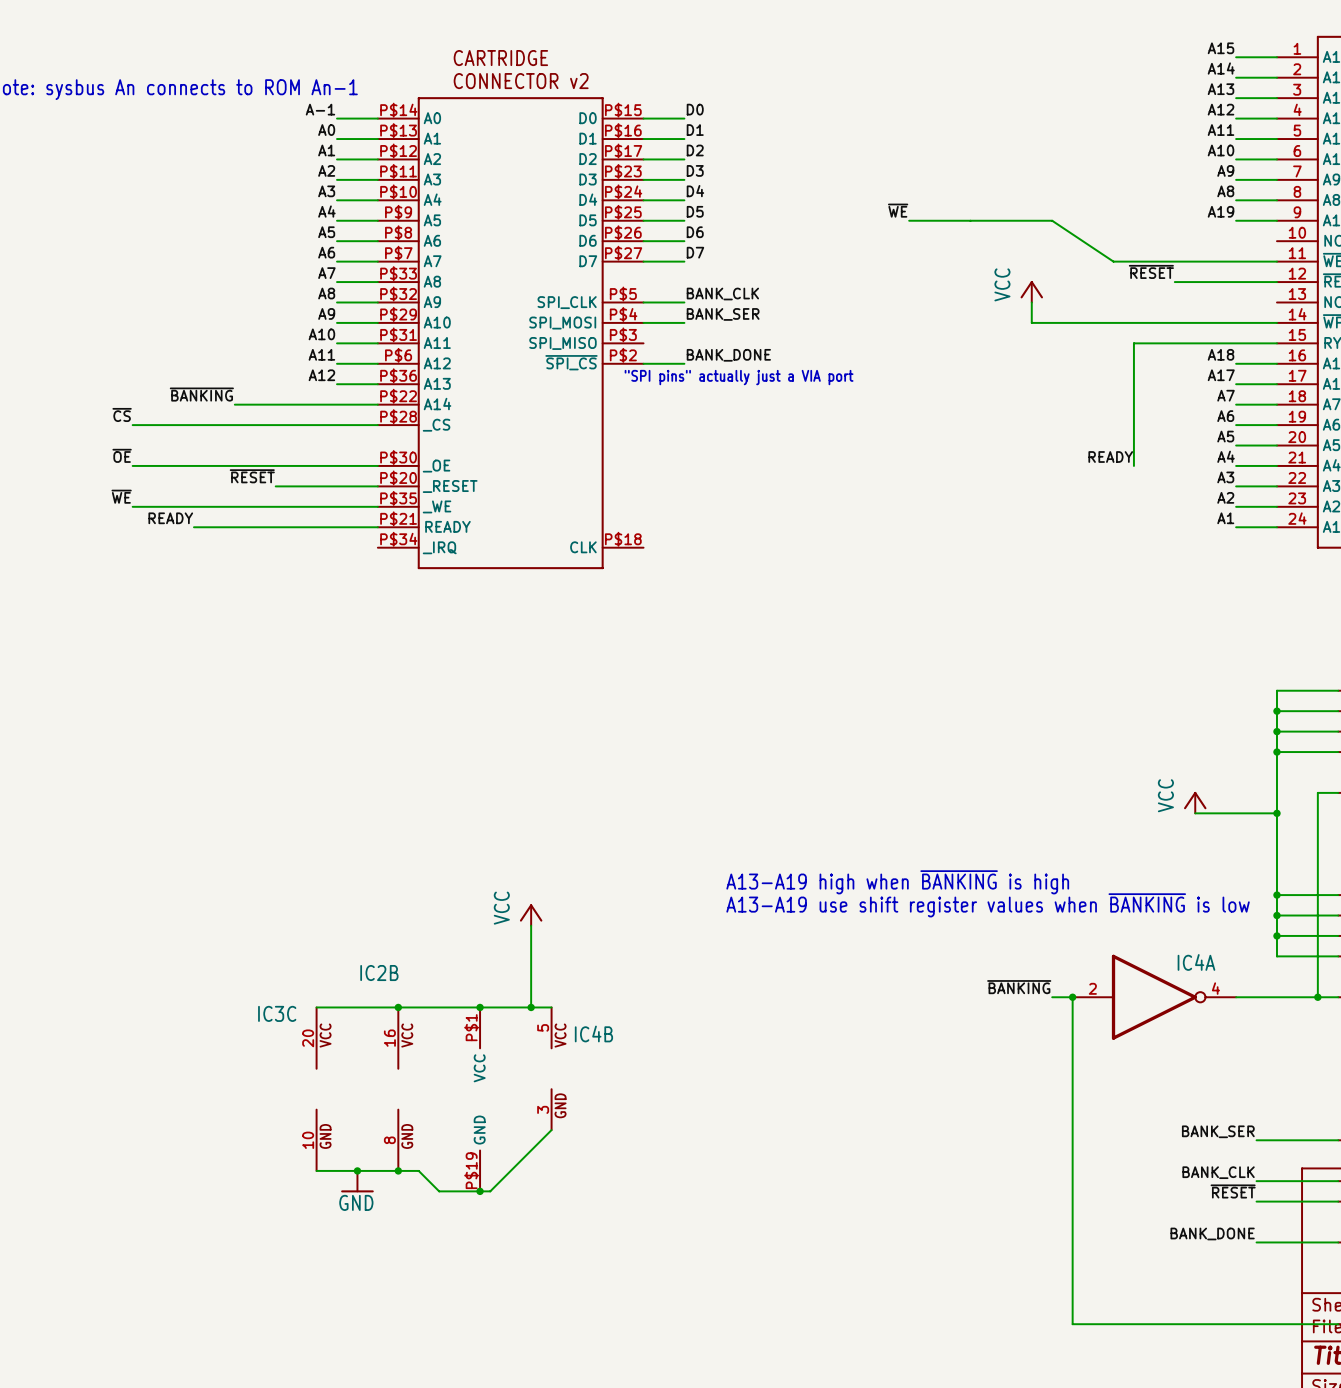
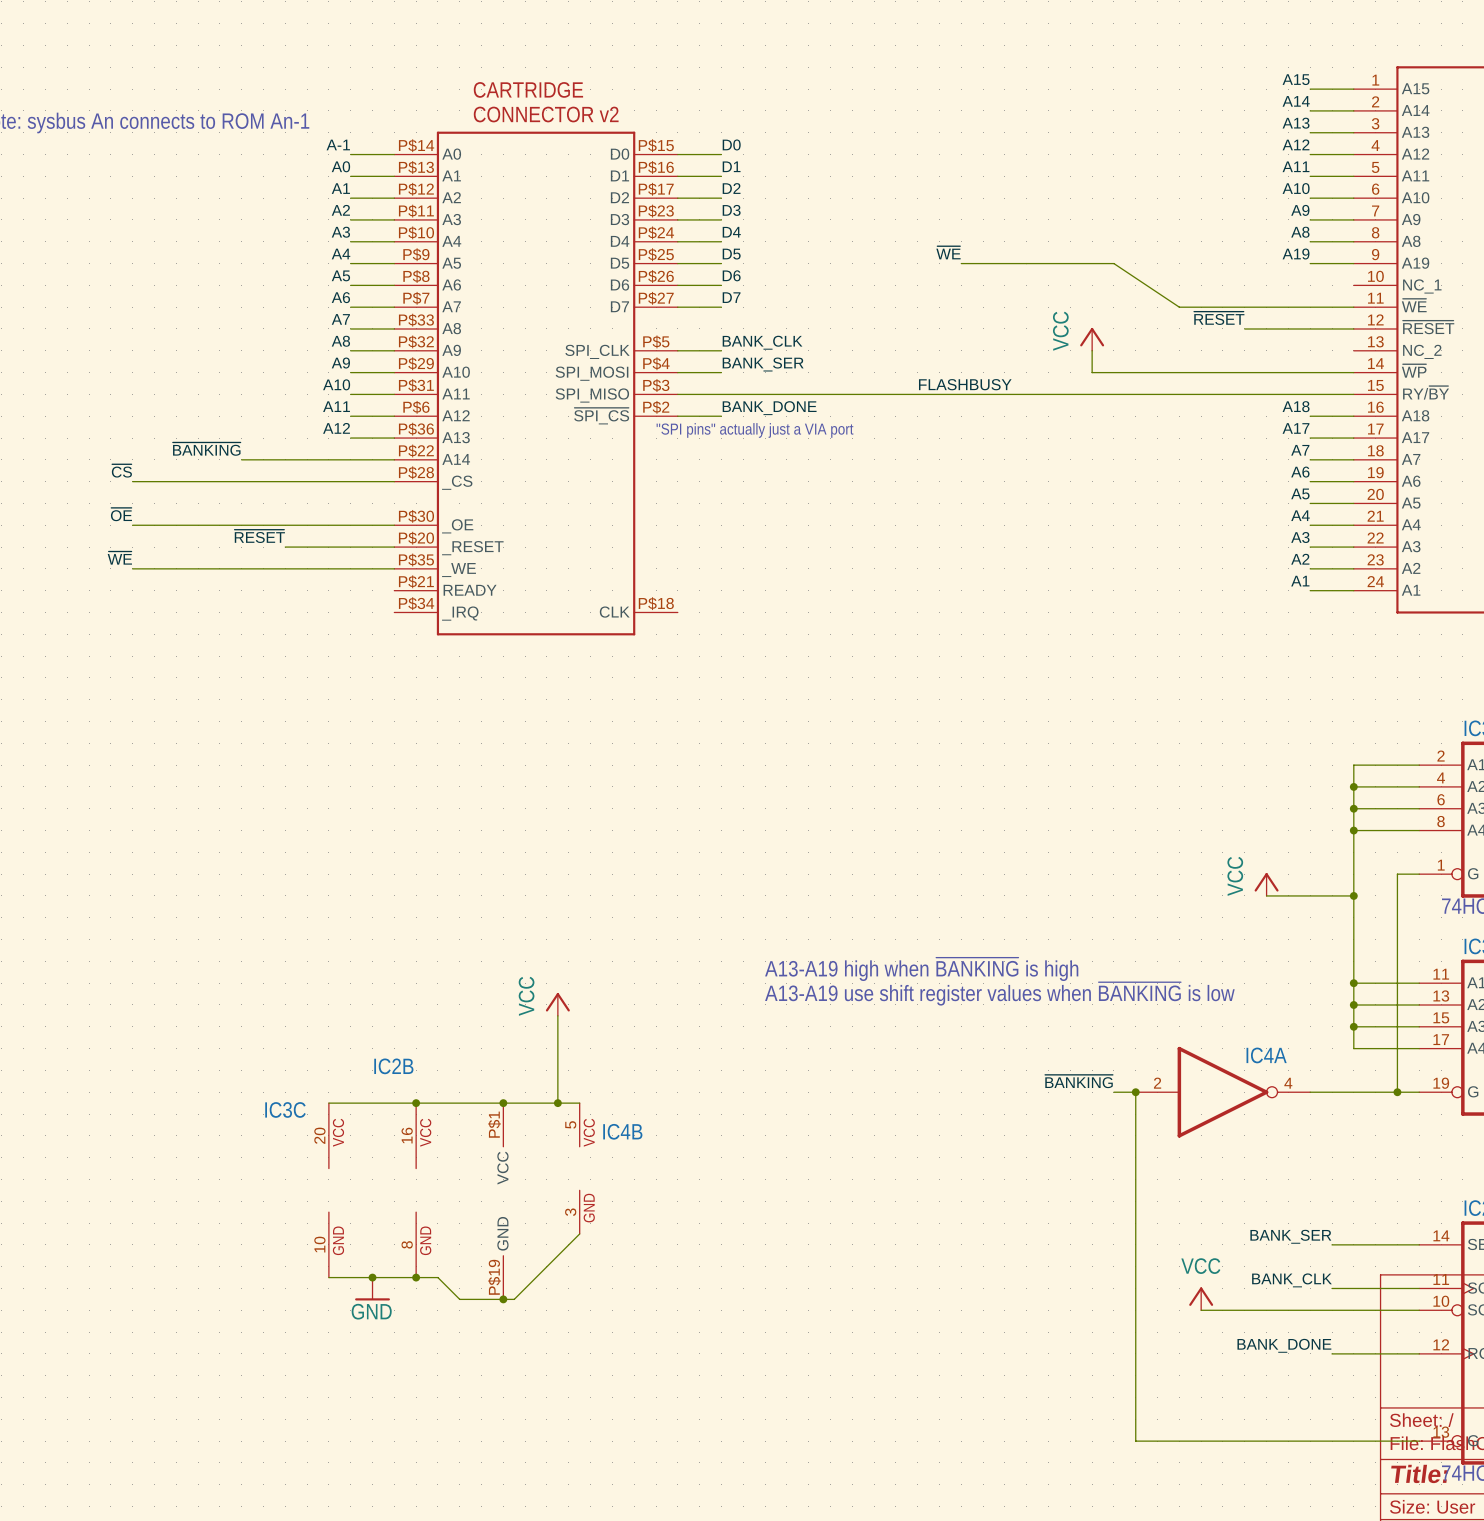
label: none -> FLASHBUSY (965, 384)
wire: (1133, 343) (1133, 465) -> (1201, 394) (677, 394)
label: READY (1110, 457) -> none
label: READY (170, 518) -> none
wire: (193, 527) (377, 527) -> none
power symbol: none -> VCC (1201, 1298)
label: ~{RESET} (1233, 1191) -> none
wire: none -> (1201, 1310) (1332, 1310)

